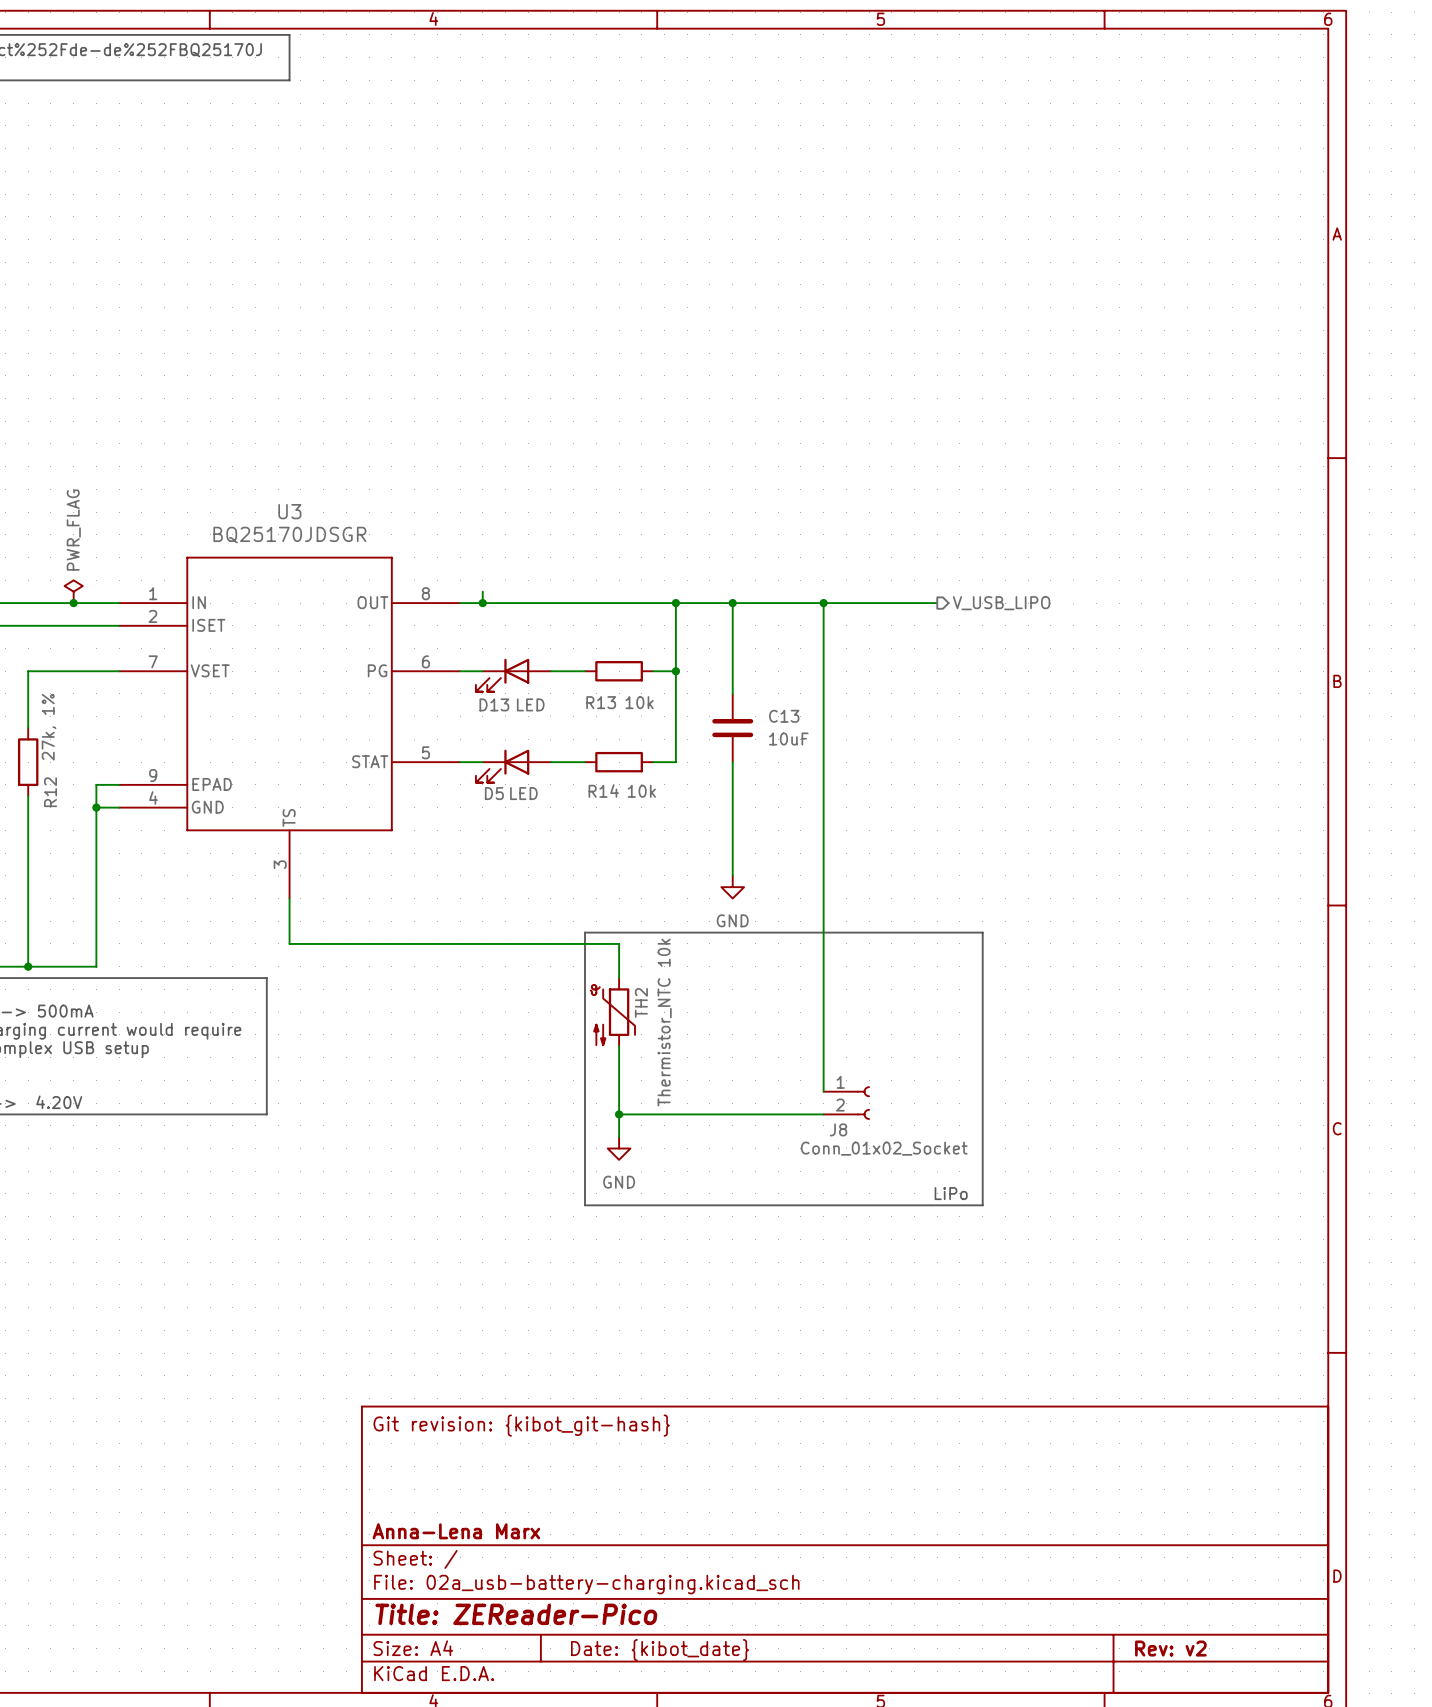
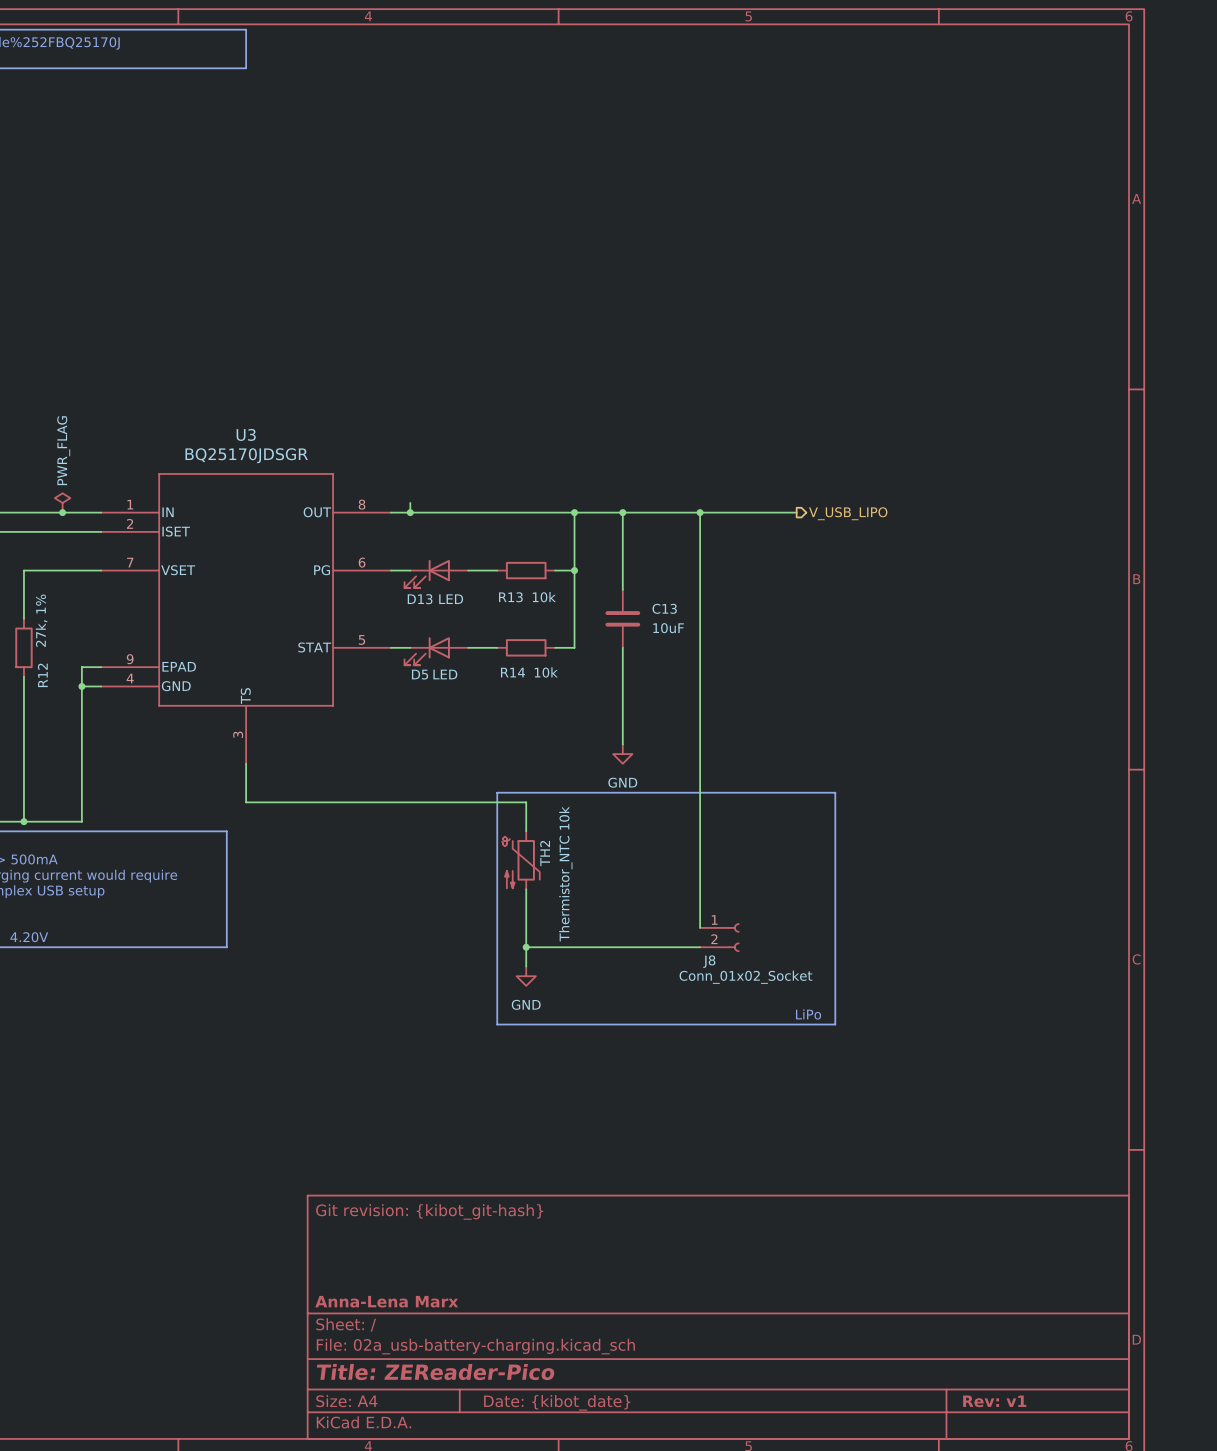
title block: Rev: v2 (1170, 1648) -> Rev: v1 (994, 1401)

